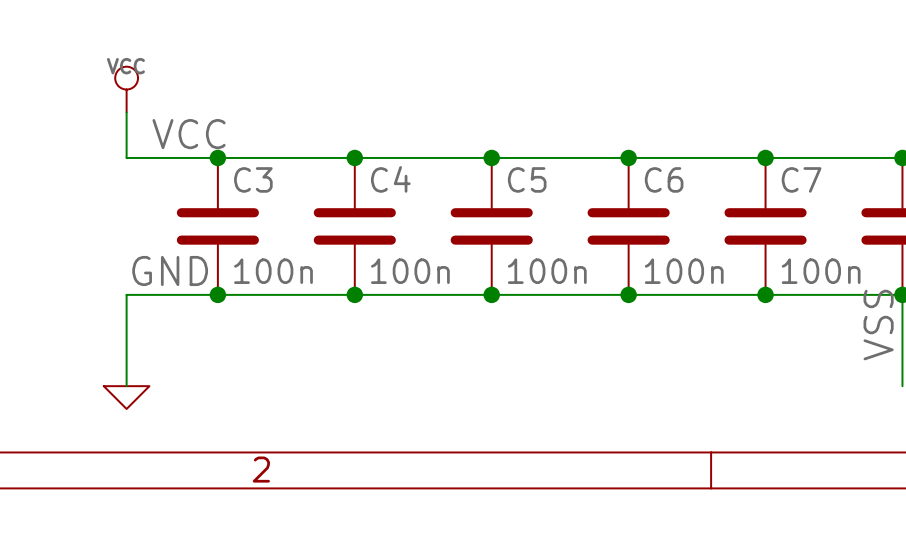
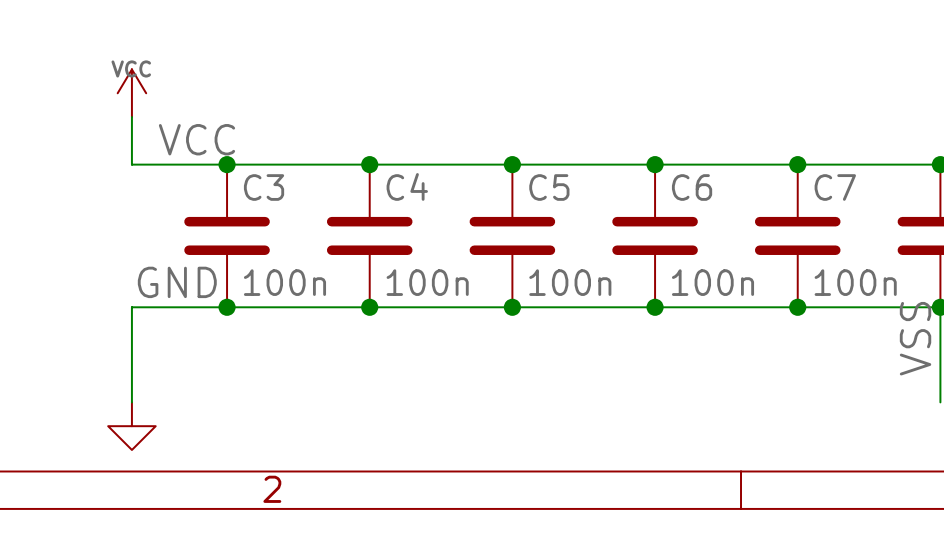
power symbol shape: [115, 66, 139, 113] -> [117, 69, 147, 118]
power symbol shape: [103, 386, 150, 409] -> [108, 402, 156, 450]

